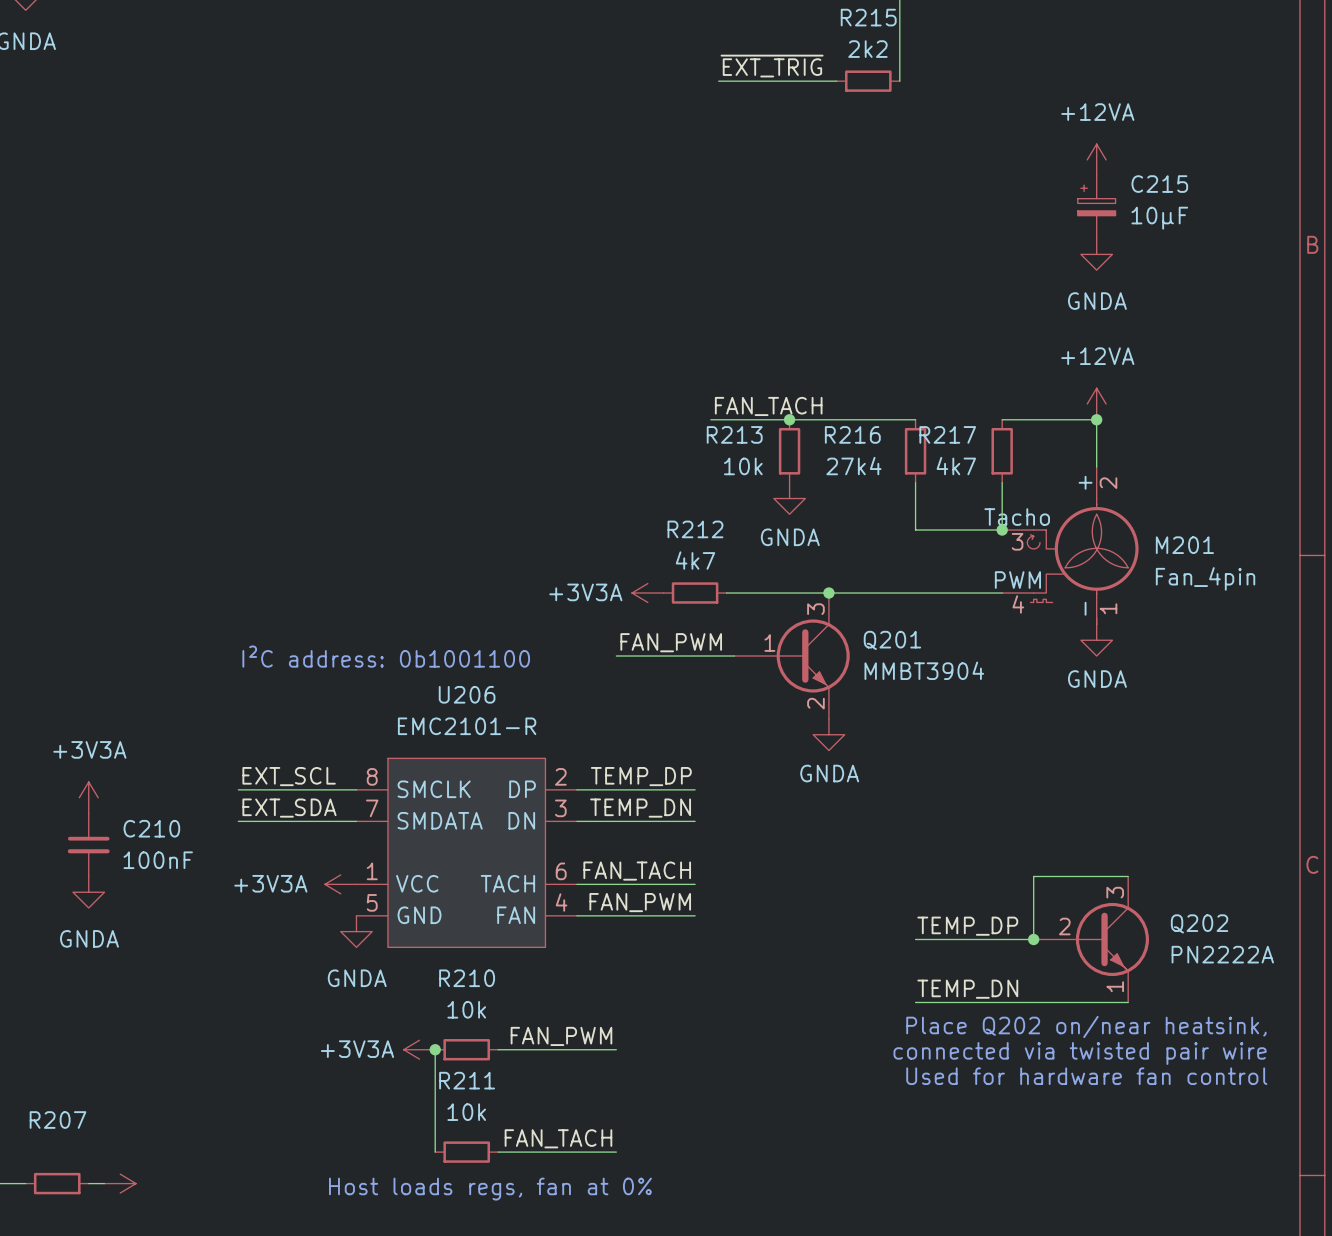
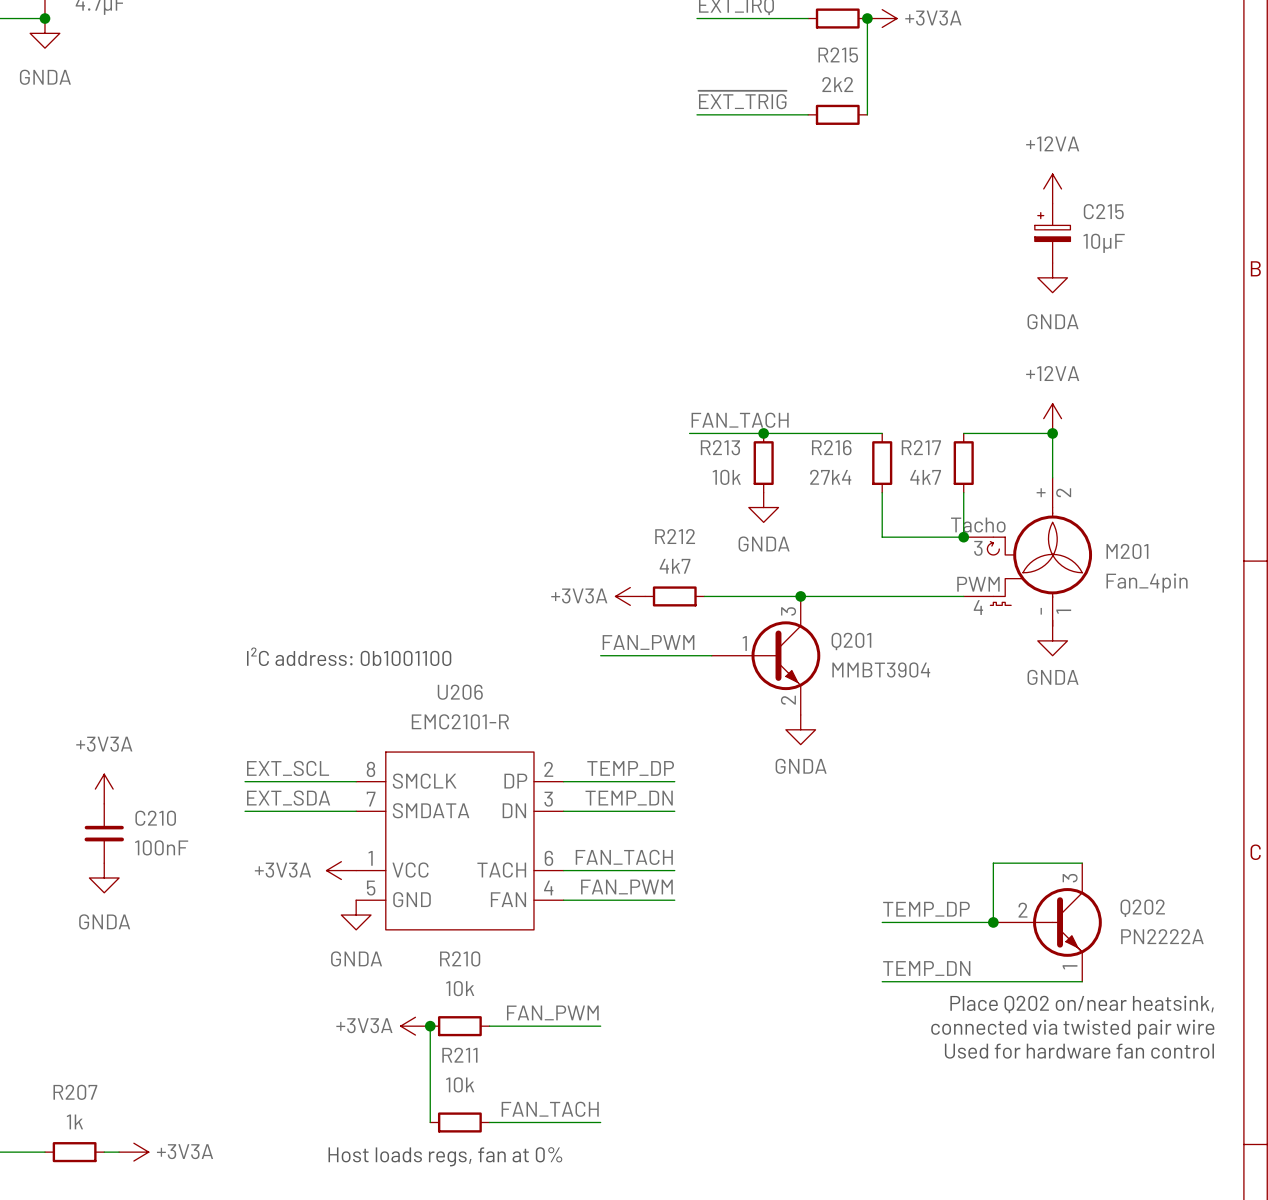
R207 value: none -> 1k (74, 1121)
power symbol text: none -> +3V3A (185, 1151)

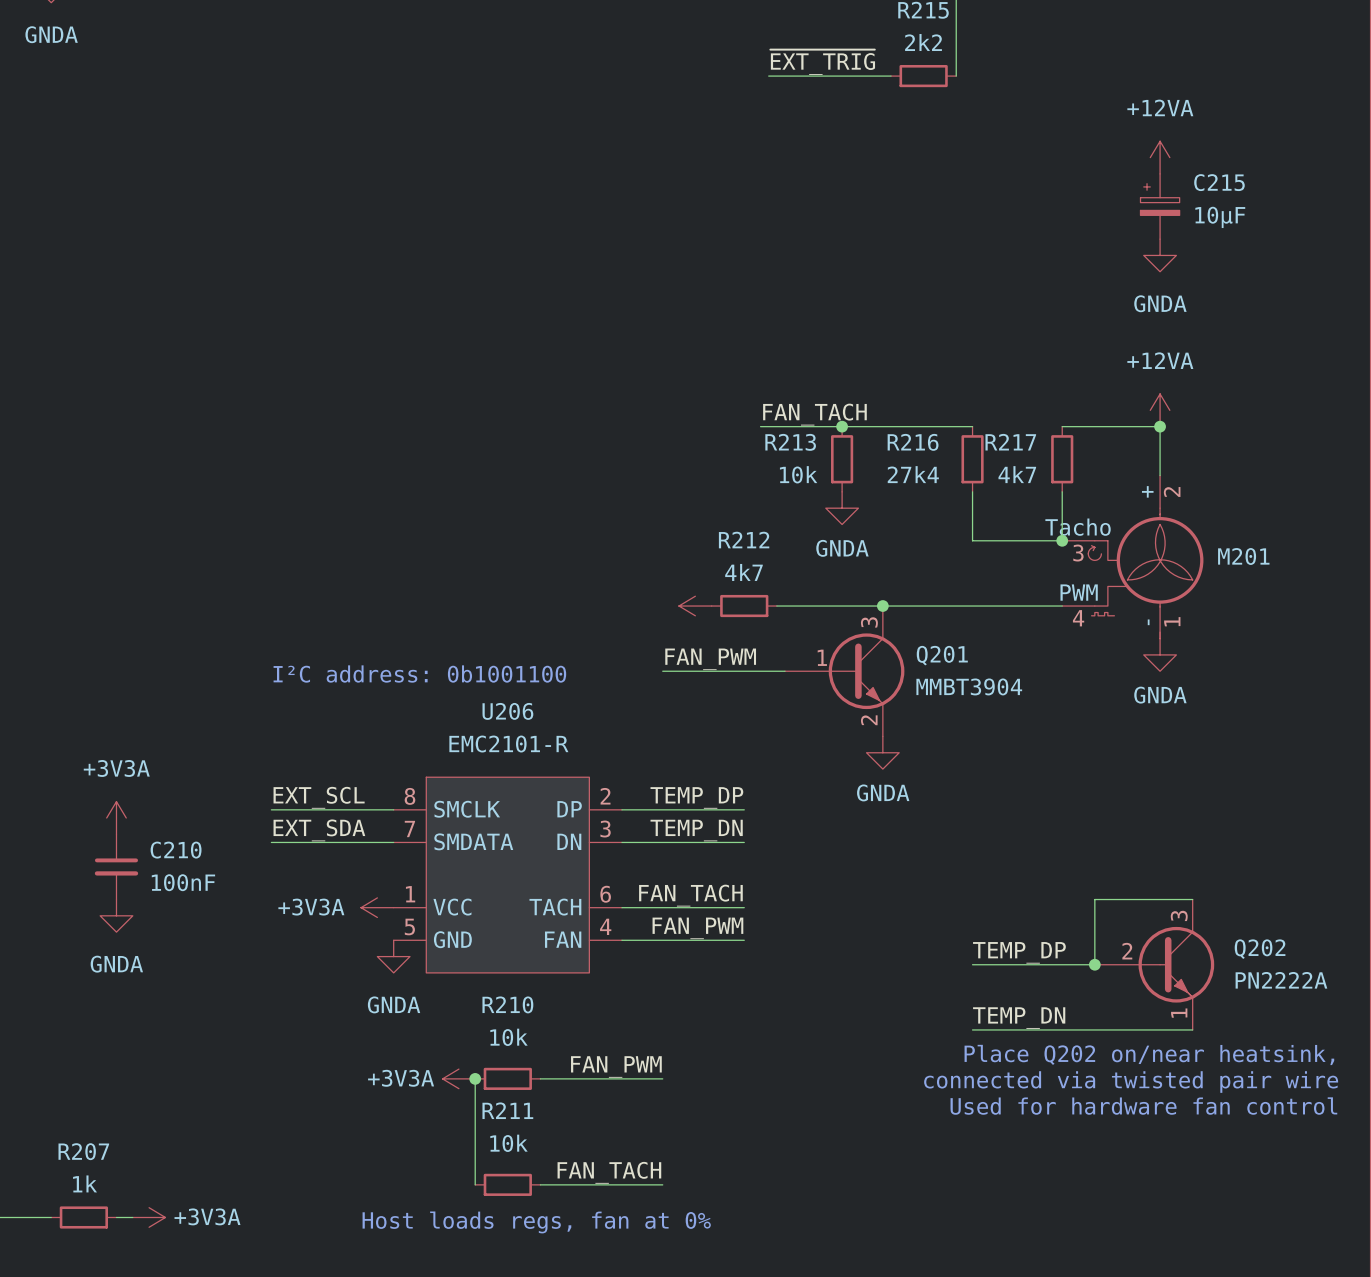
M201 value: Fan_4pin (1147, 583) -> none
power symbol text: +3V3A (579, 595) -> none

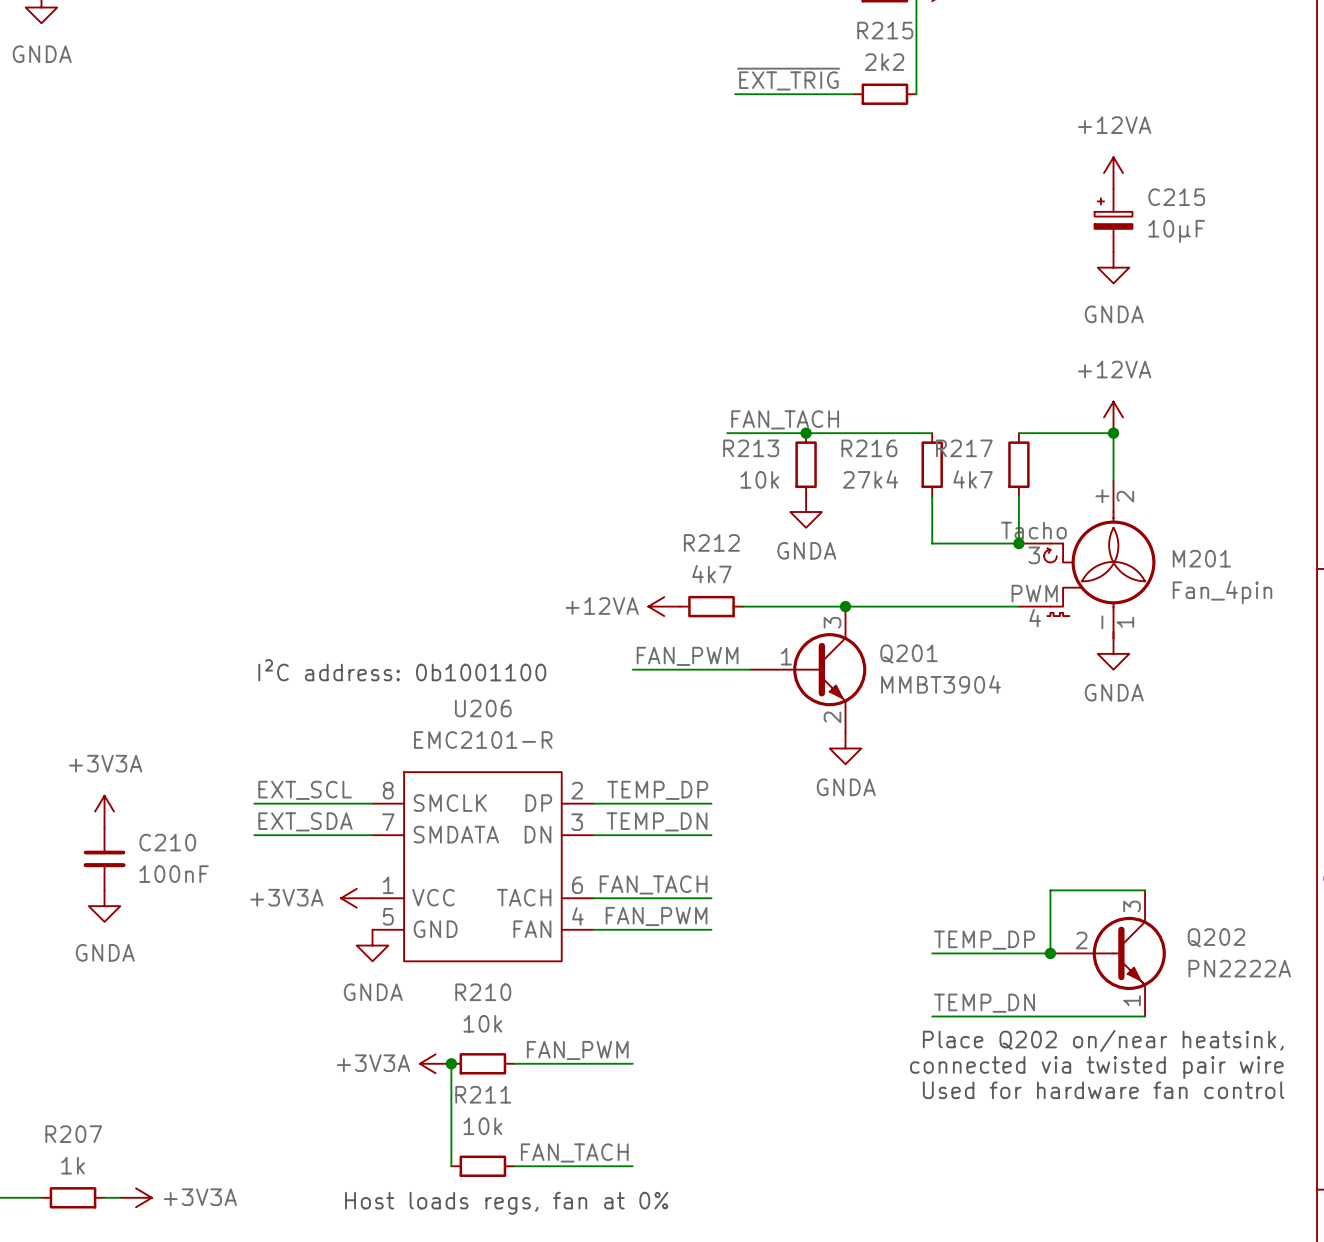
M201 value: none -> Fan_4pin (1222, 592)
power symbol text: none -> +12VA (602, 606)

